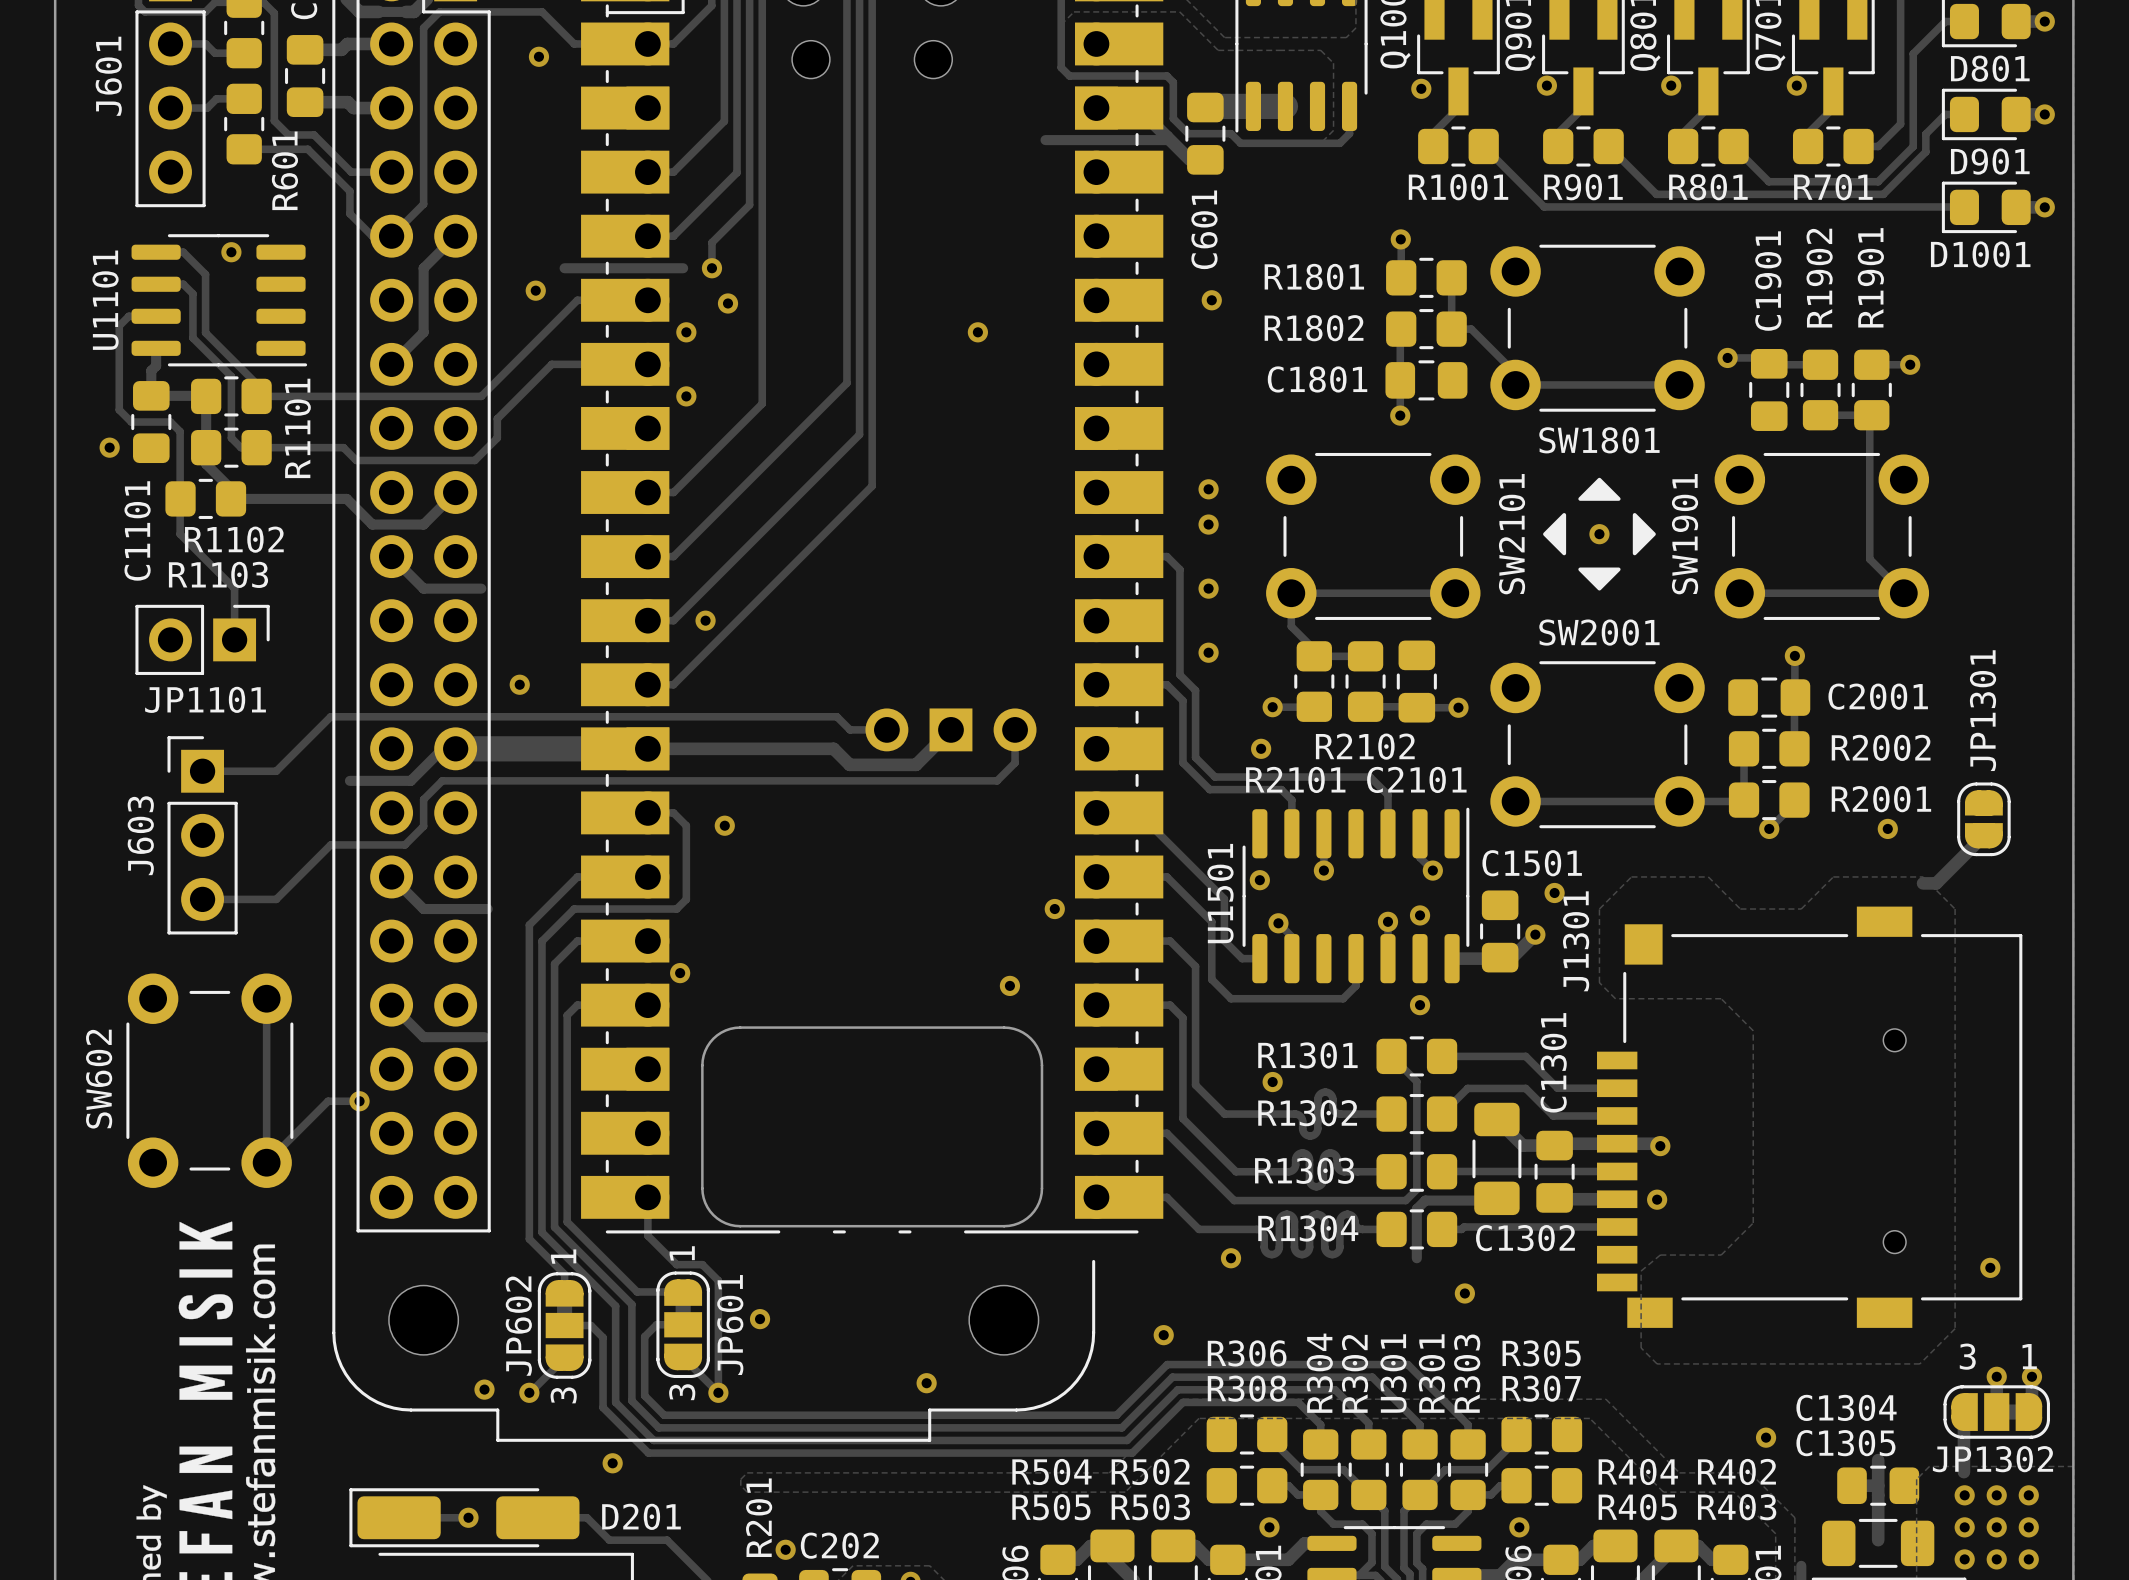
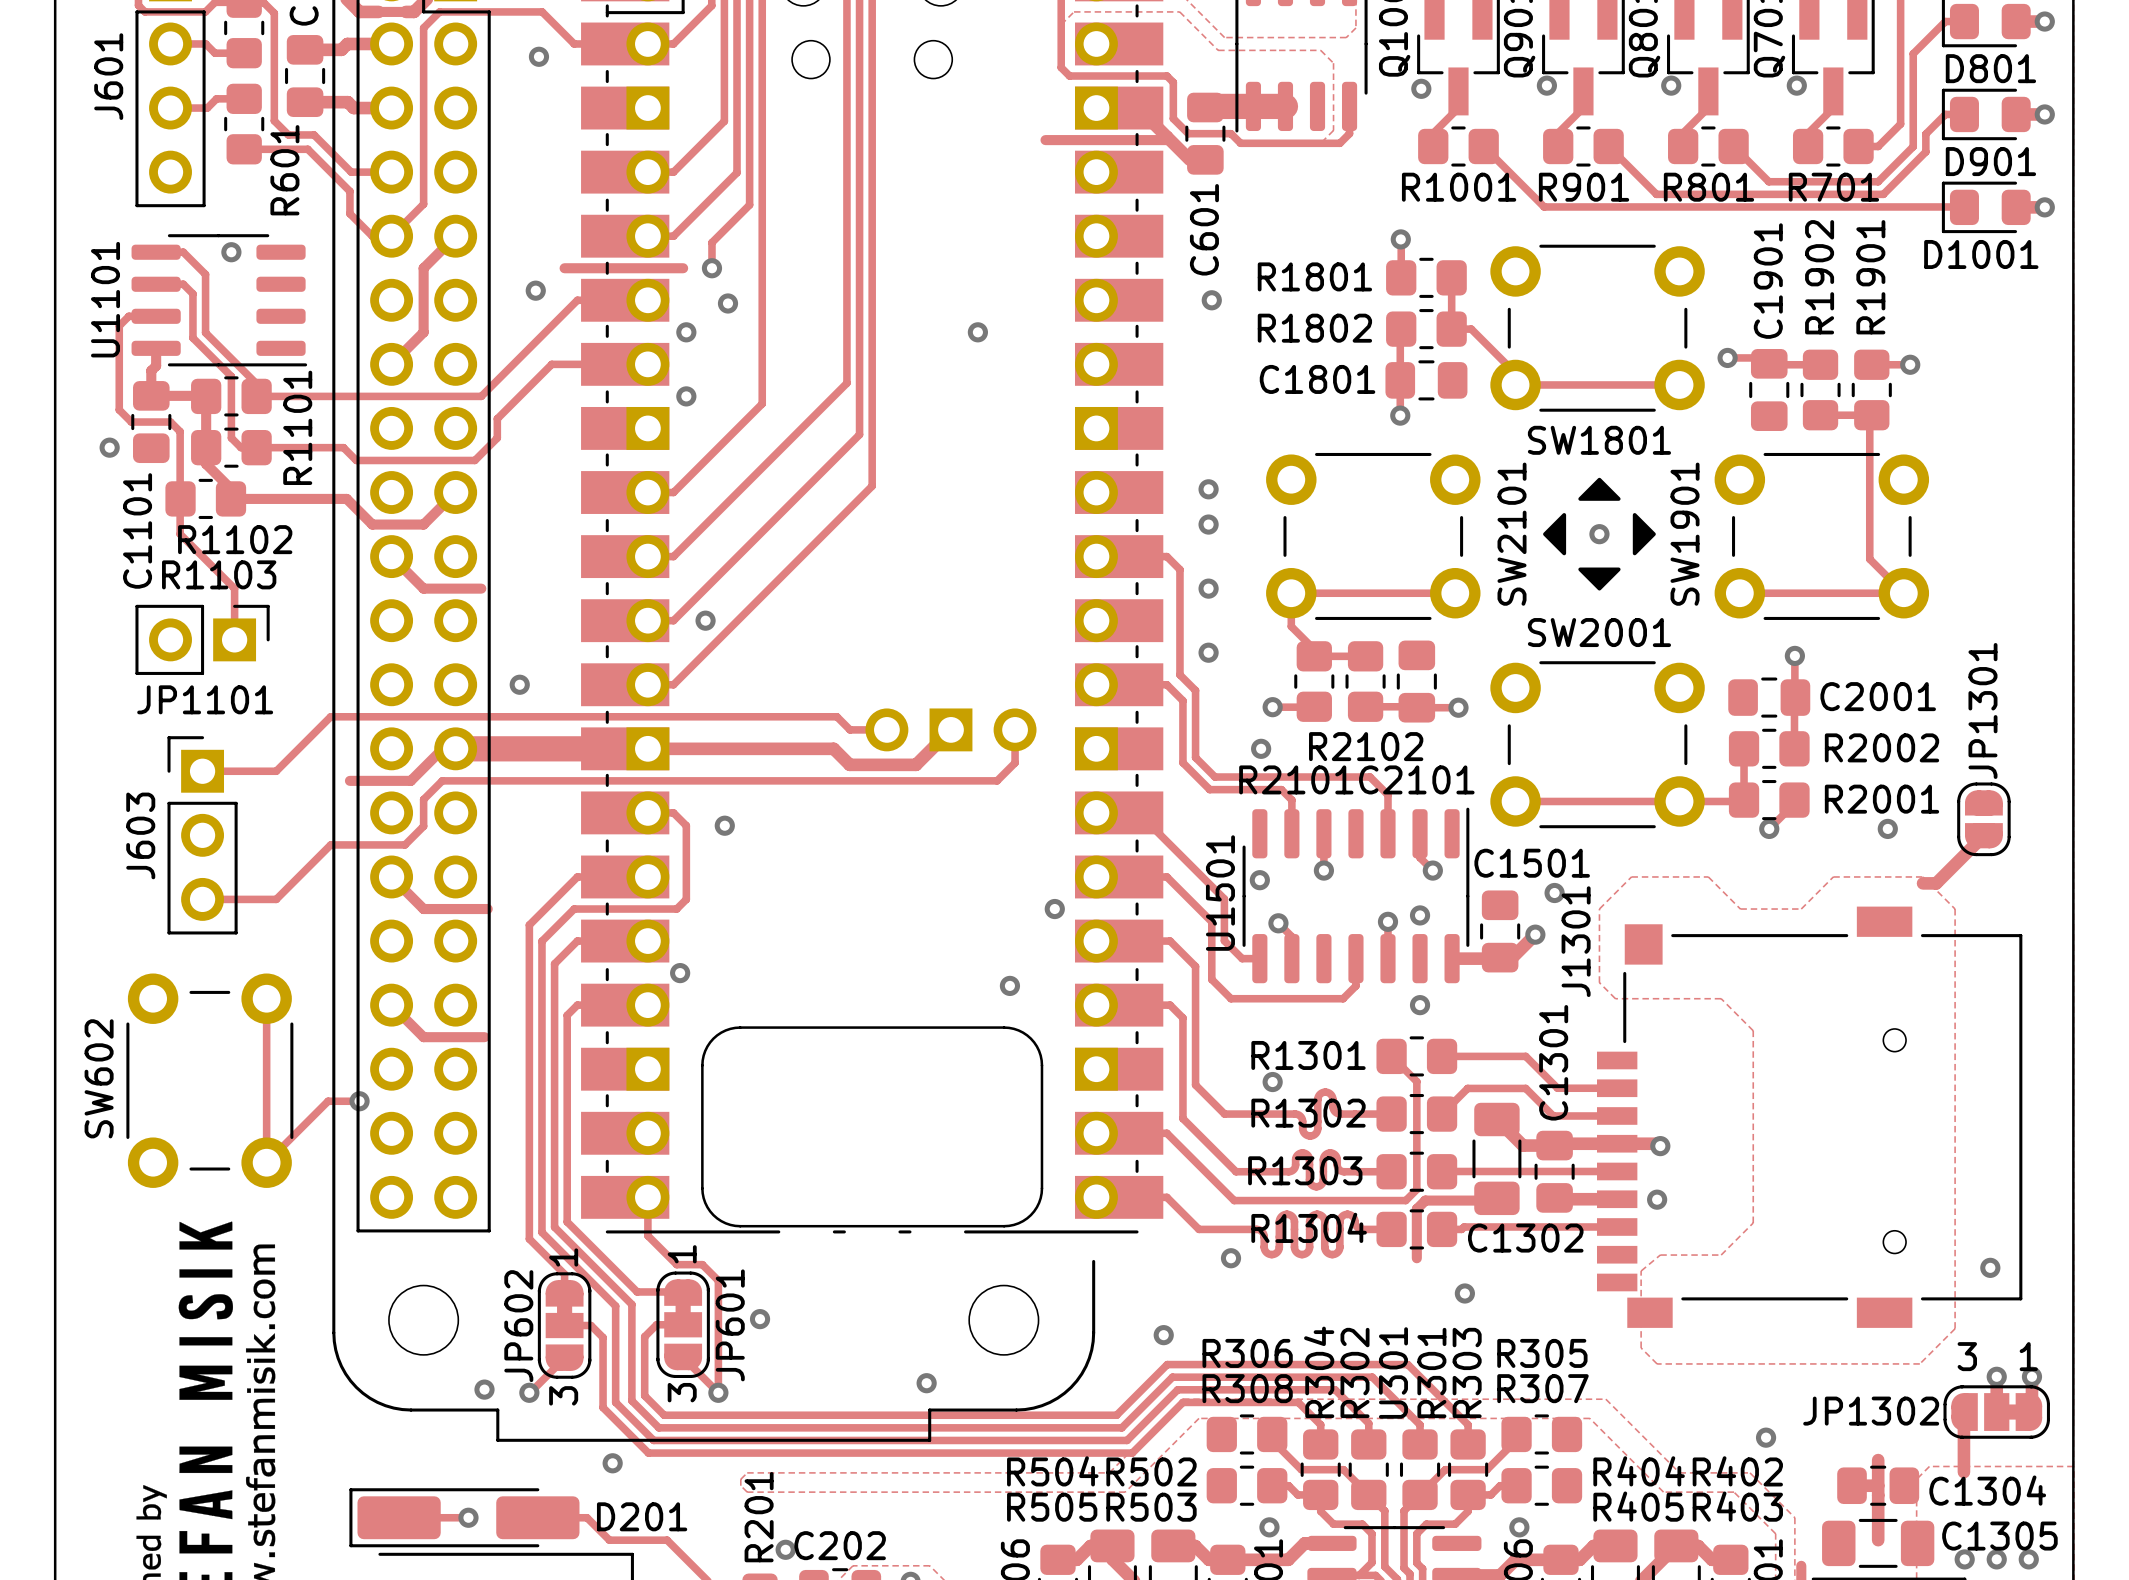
C1304 name position: C1304 (1846, 1407) -> C1304 (1987, 1490)
C1305 name position: C1305 (1845, 1443) -> C1305 (1999, 1536)
JP1302 name position: JP1302 (1992, 1459) -> JP1302 (1871, 1411)
via: (1964, 1495) -> none
via: (1996, 1495) -> none
via: (2028, 1495) -> none
via: (1964, 1527) -> none
via: (1996, 1527) -> none
via: (2028, 1527) -> none

